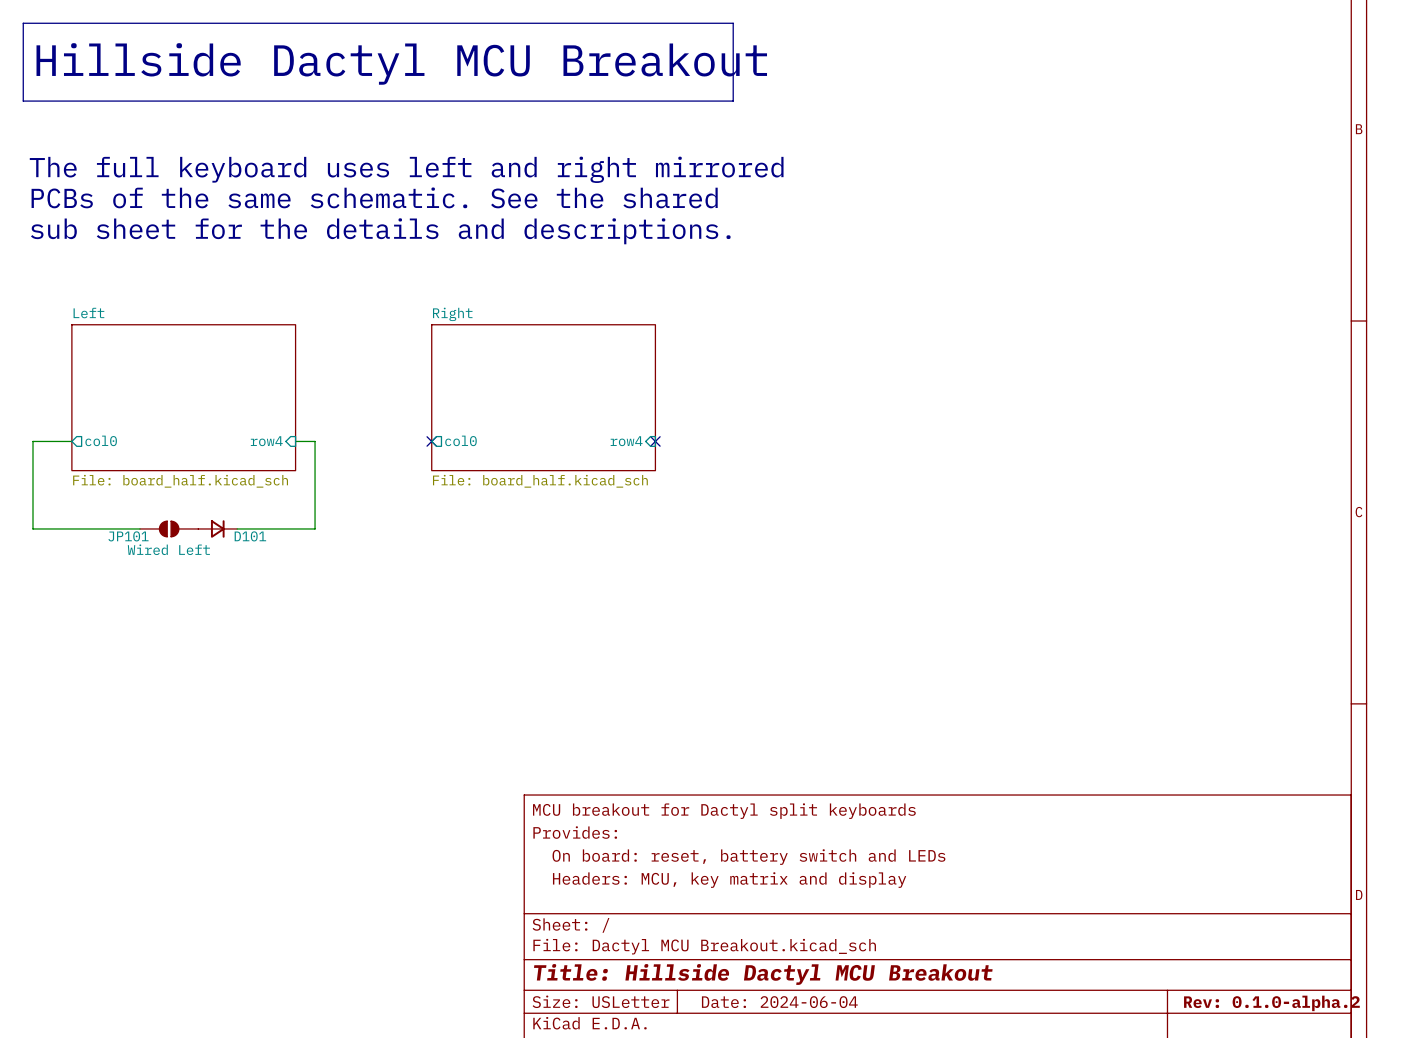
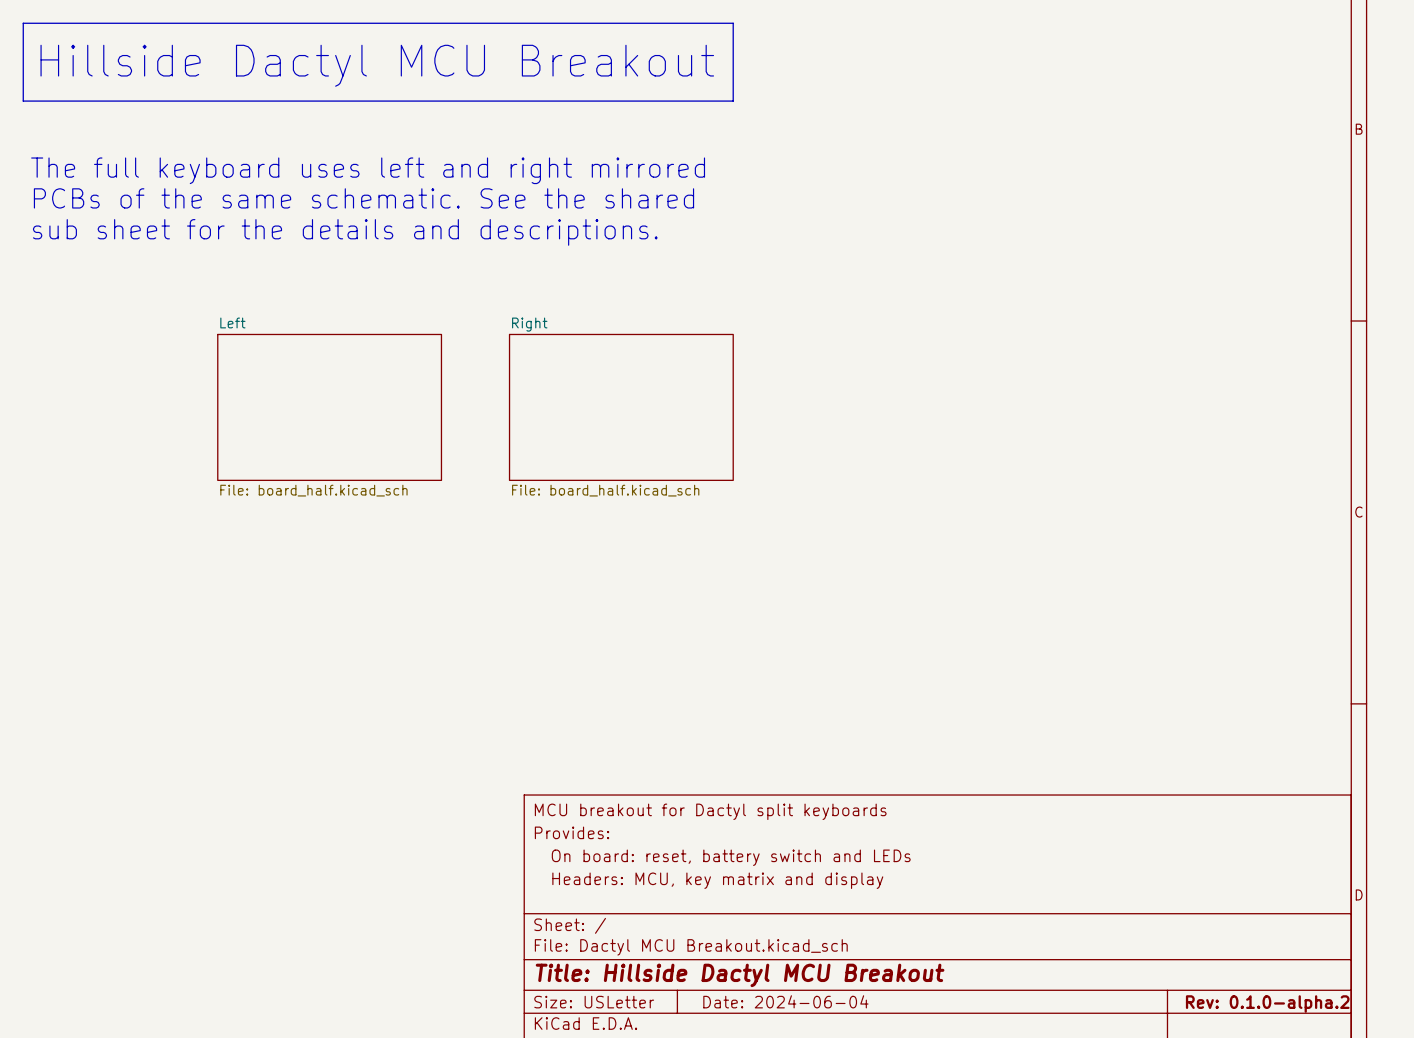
sheet Left position: (183, 397) -> (329, 407)
sheet Right position: (543, 397) -> (621, 407)
sheet pin: col0 (101, 440) -> none
sheet pin: col0 (461, 440) -> none
wire: (71, 441) (32, 441) (32, 528) (139, 528) -> none
sheet pin: row4 (266, 441) -> none
wire: (295, 441) (315, 441) (315, 528) (237, 528) -> none
no-connect mark: (431, 441) -> none
sheet pin: row4 (626, 441) -> none
no-connect mark: (655, 441) -> none
JP101: Wired Left (169, 528) -> none
D101: (217, 528) -> none

